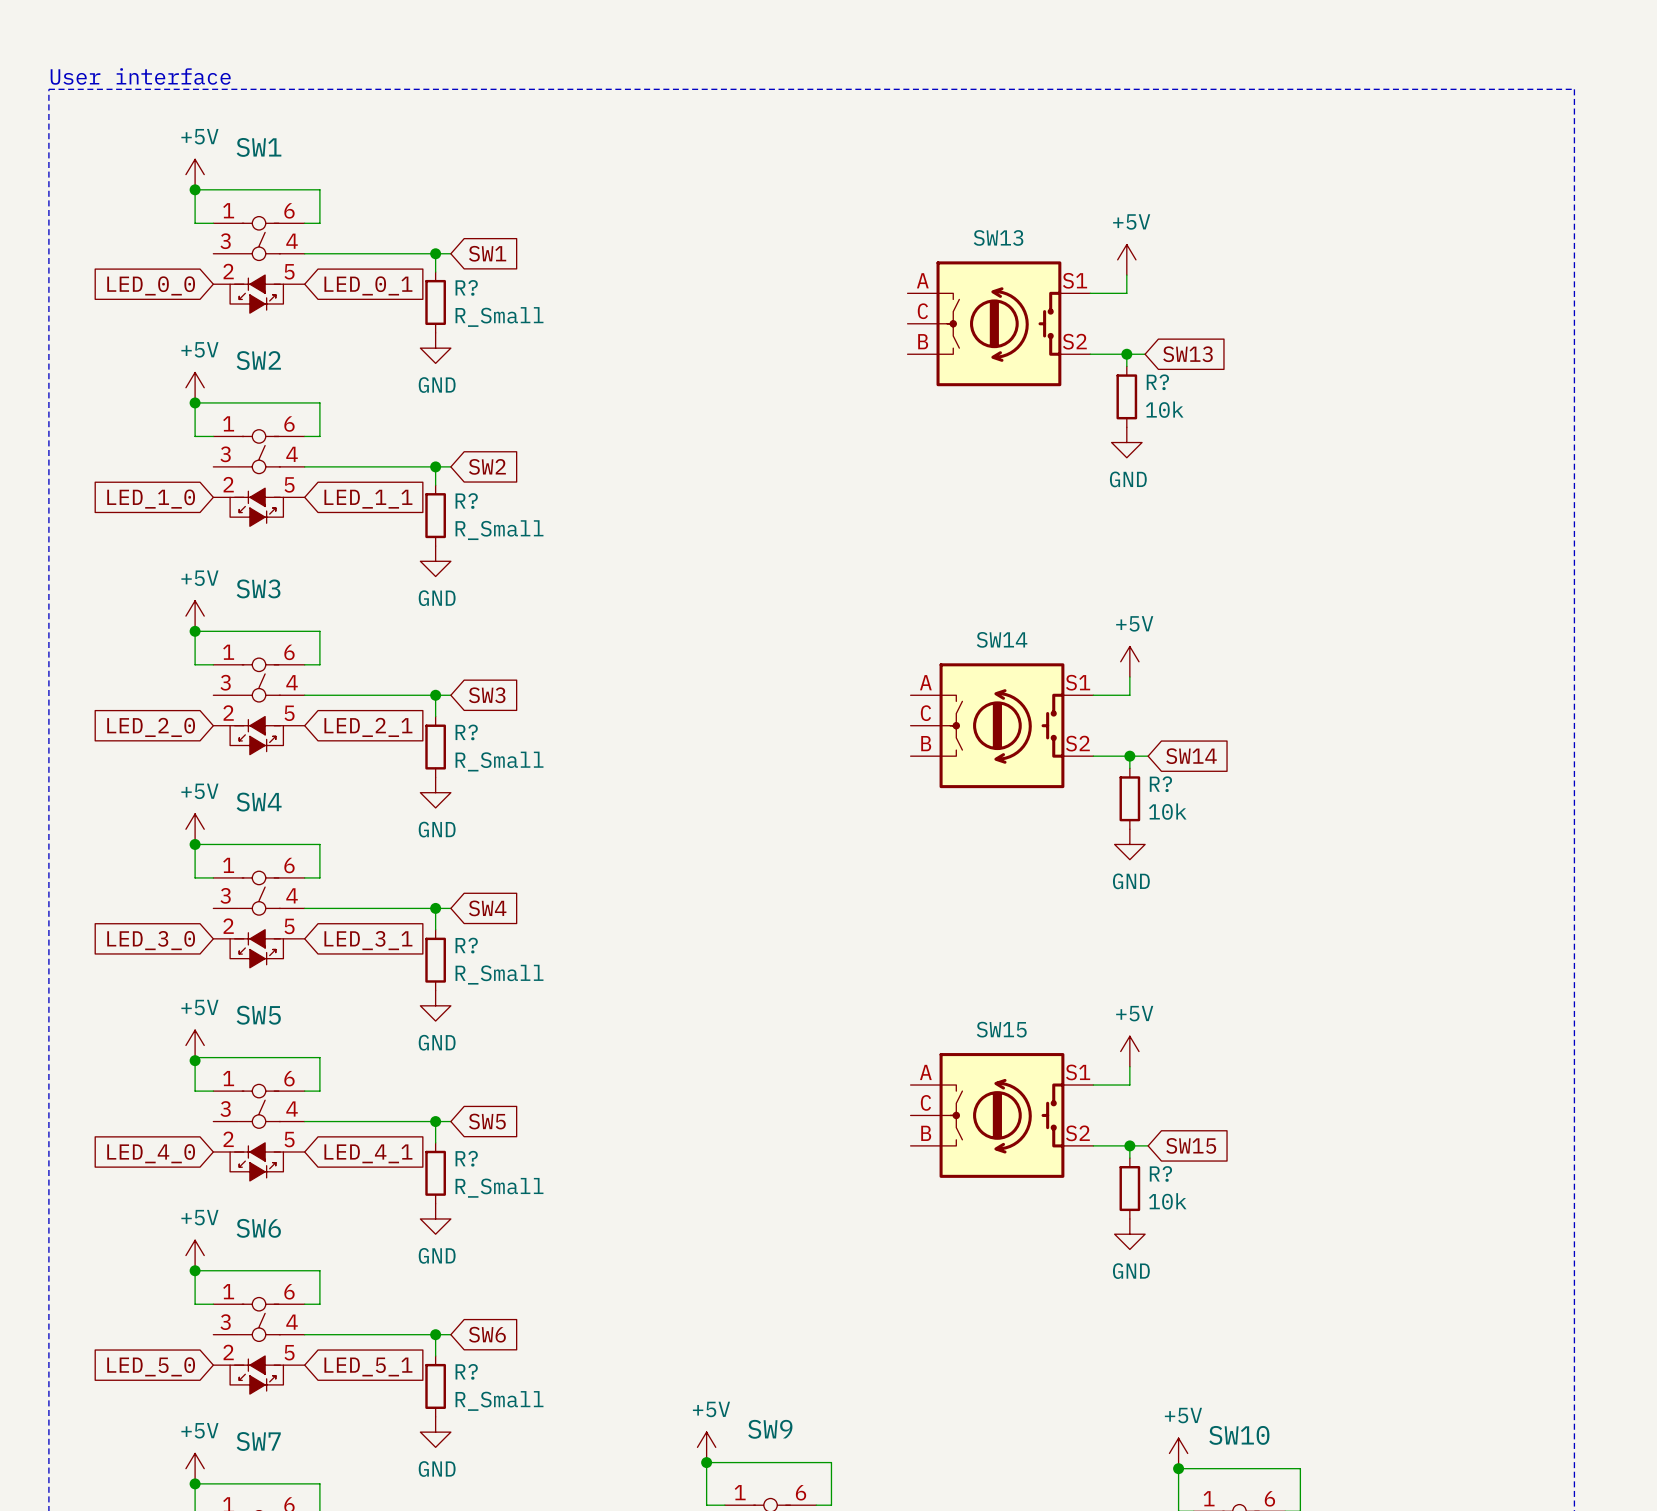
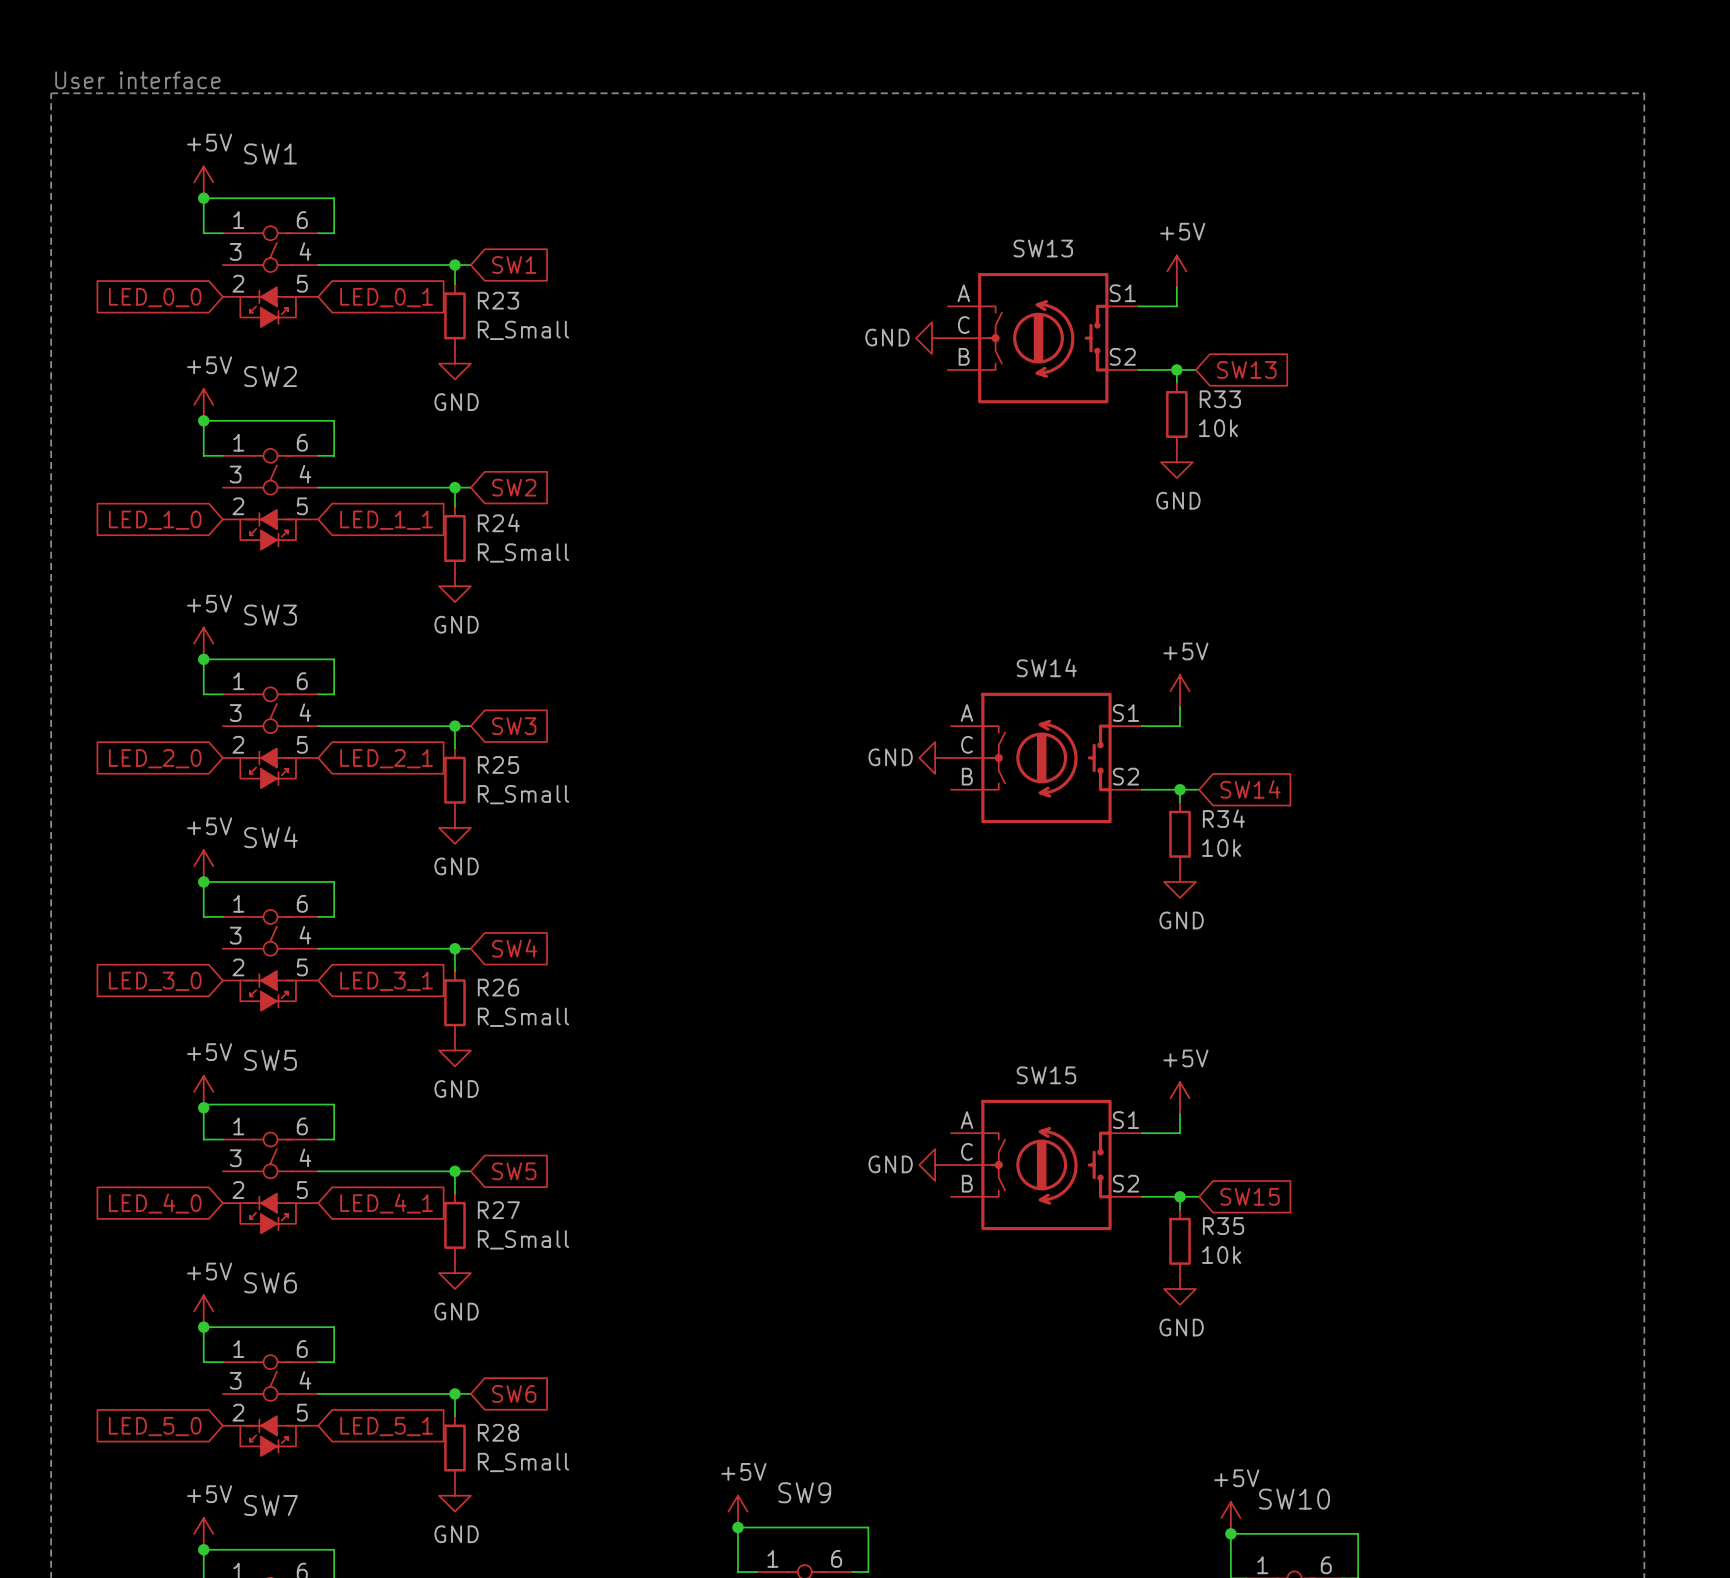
R? name: R? (466, 287) -> R23 (498, 300)
power symbol: none -> GND (931, 338)
R? name: R? (1157, 382) -> R33 (1220, 399)
R? name: R? (466, 501) -> R24 (498, 522)
power symbol: none -> GND (935, 757)
R? name: R? (466, 732) -> R25 (498, 764)
R? name: R? (1160, 784) -> R34 (1223, 818)
R? name: R? (466, 945) -> R26 (498, 987)
power symbol: none -> GND (935, 1164)
R? name: R? (466, 1158) -> R27 (498, 1210)
R? name: R? (1160, 1173) -> R35 (1223, 1226)
R? name: R? (466, 1371) -> R28 (498, 1432)

